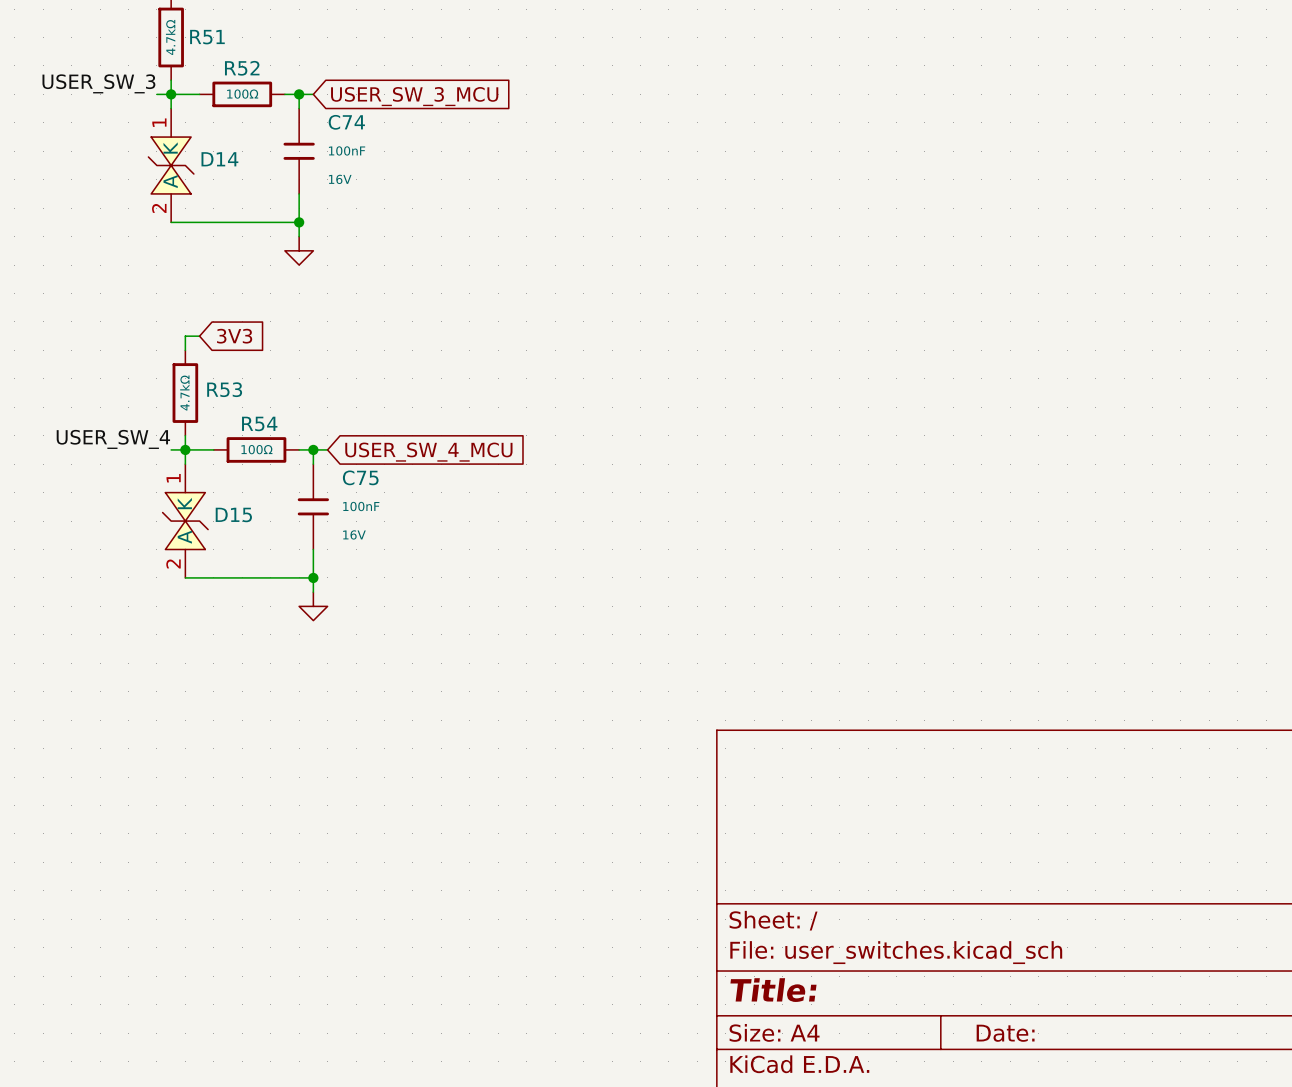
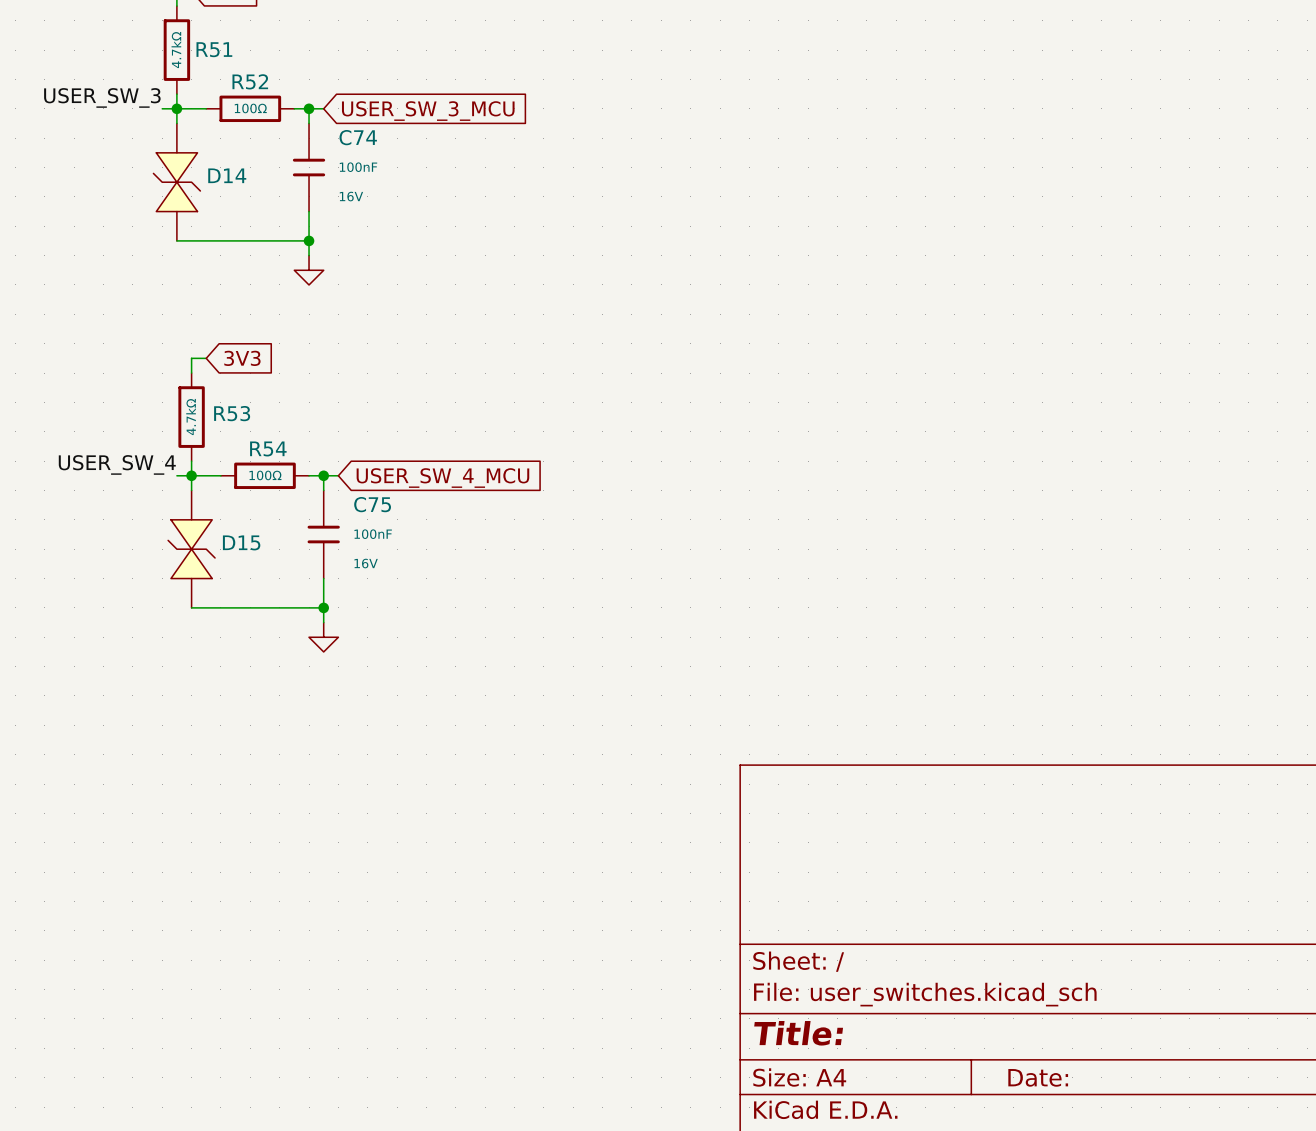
D14 pin number: 1 (159, 122) -> none
D14 pin name: K (170, 147) -> none
D14 pin name: A (170, 181) -> none
D14 pin number: 2 (159, 208) -> none
D15 pin number: 1 (173, 478) -> none
D15 pin name: K (184, 503) -> none
D15 pin name: A (184, 537) -> none
D15 pin number: 2 (173, 563) -> none

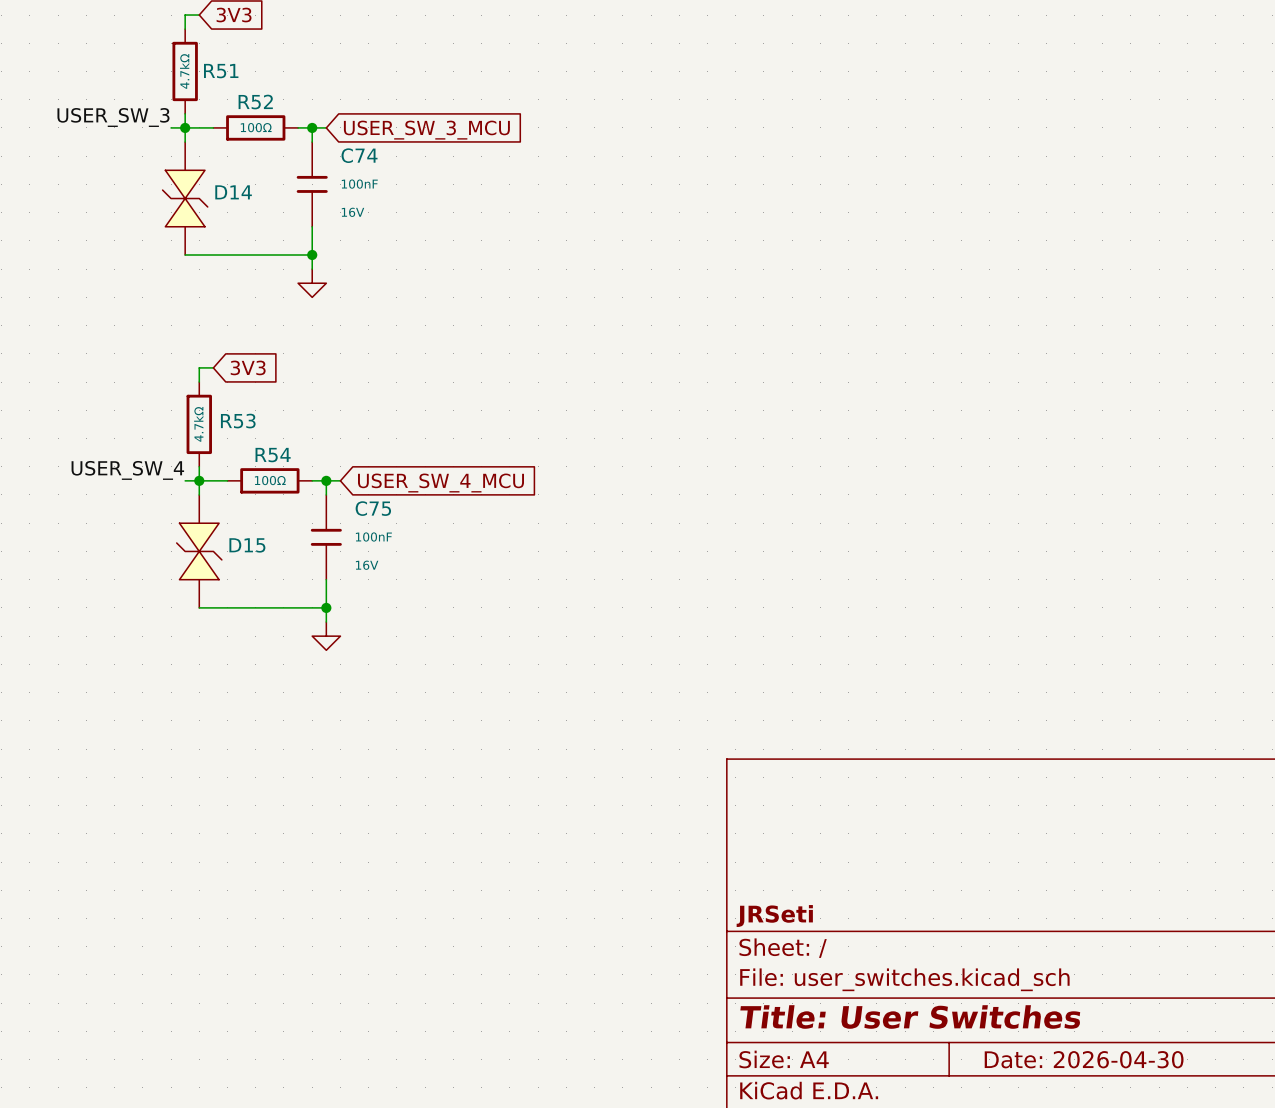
title block: none -> JRSeti (774, 916)
title block: Title: (798, 1033) -> Title: User Switches (910, 1016)
title block: Date: (1038, 1077) -> Date: 2026-04-30 (1084, 1059)

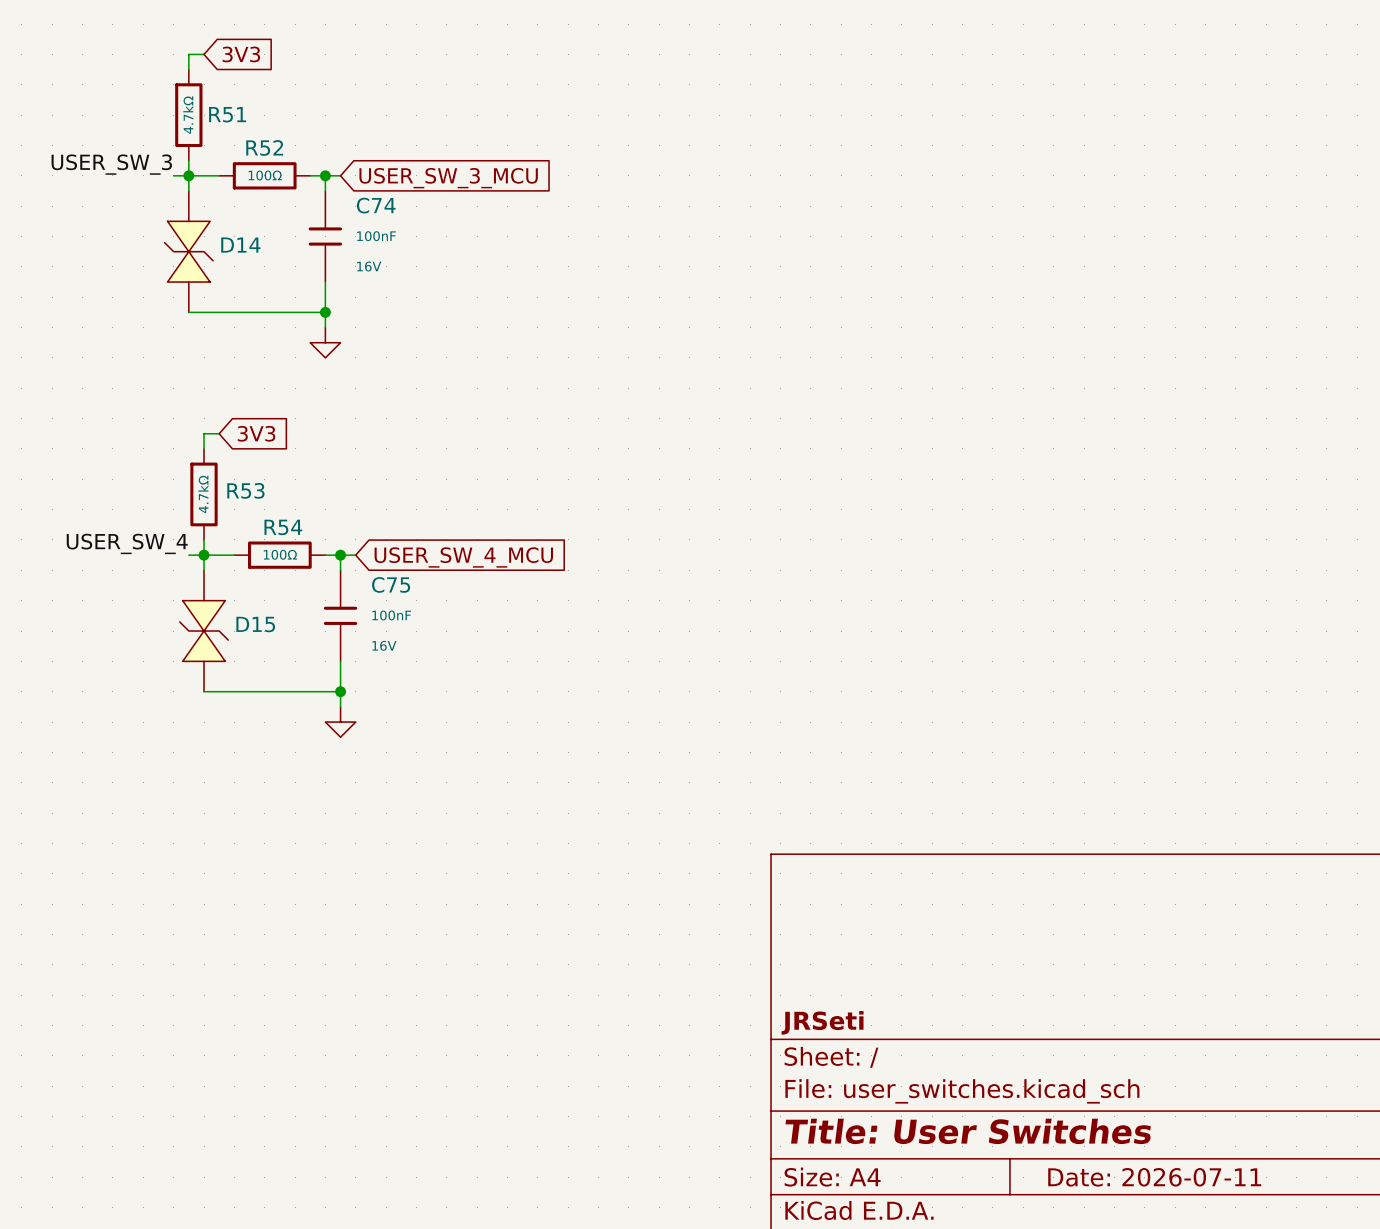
title block: Date: 2026-04-30 (1084, 1059) -> Date: 2026-07-11 (1154, 1177)

